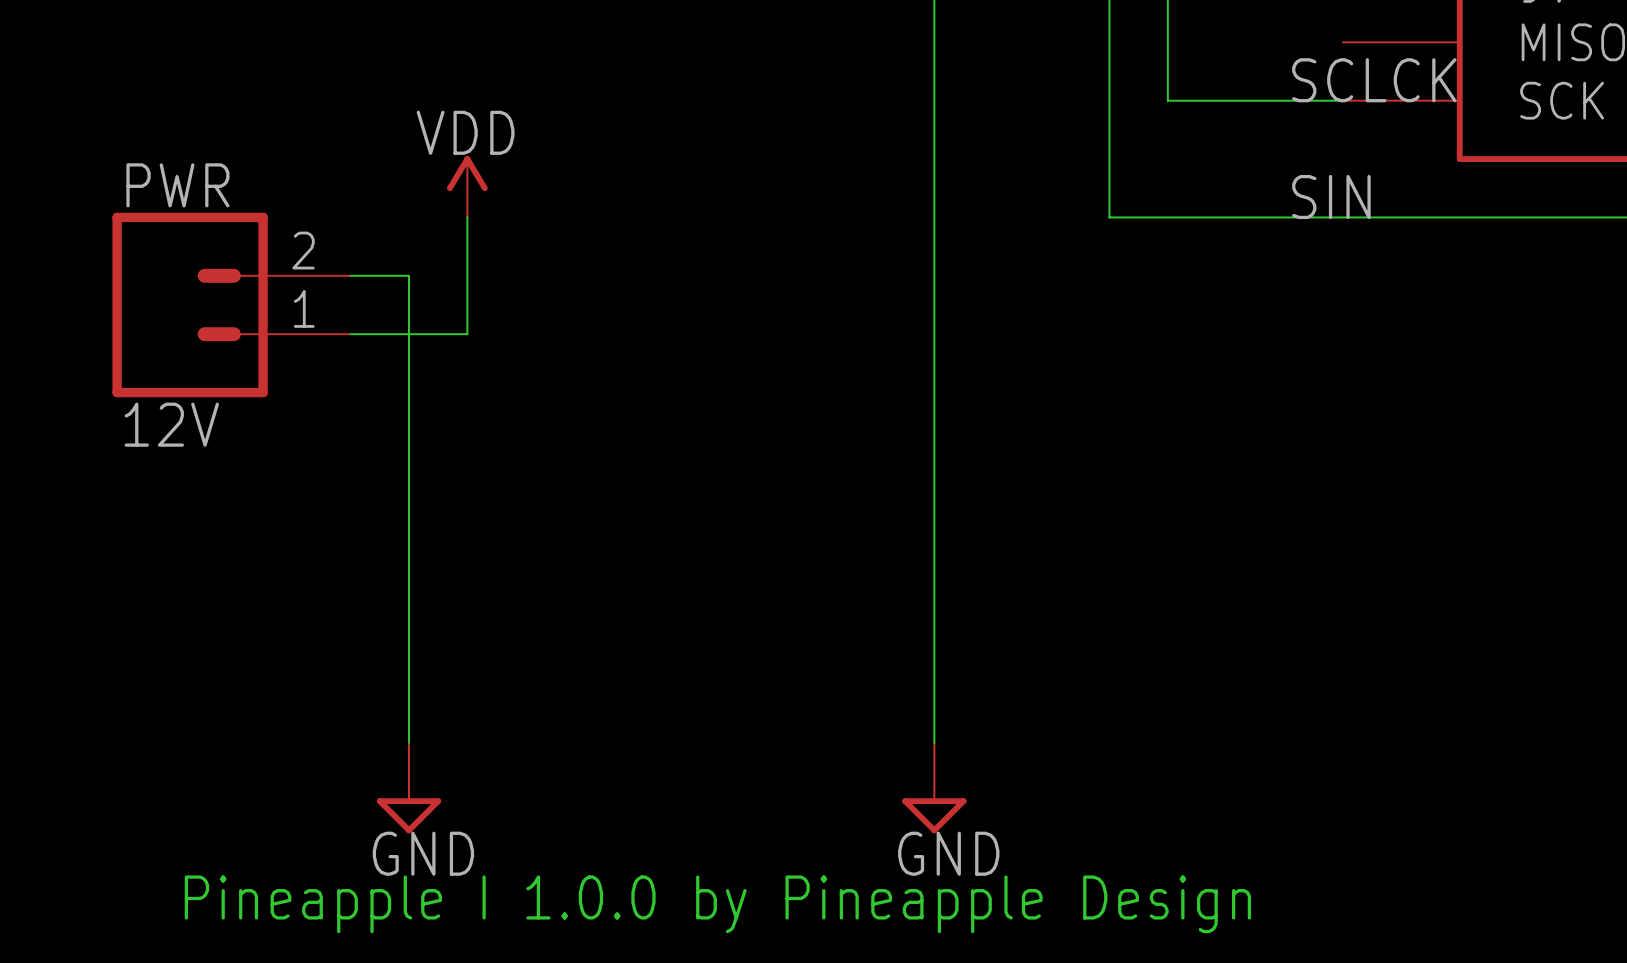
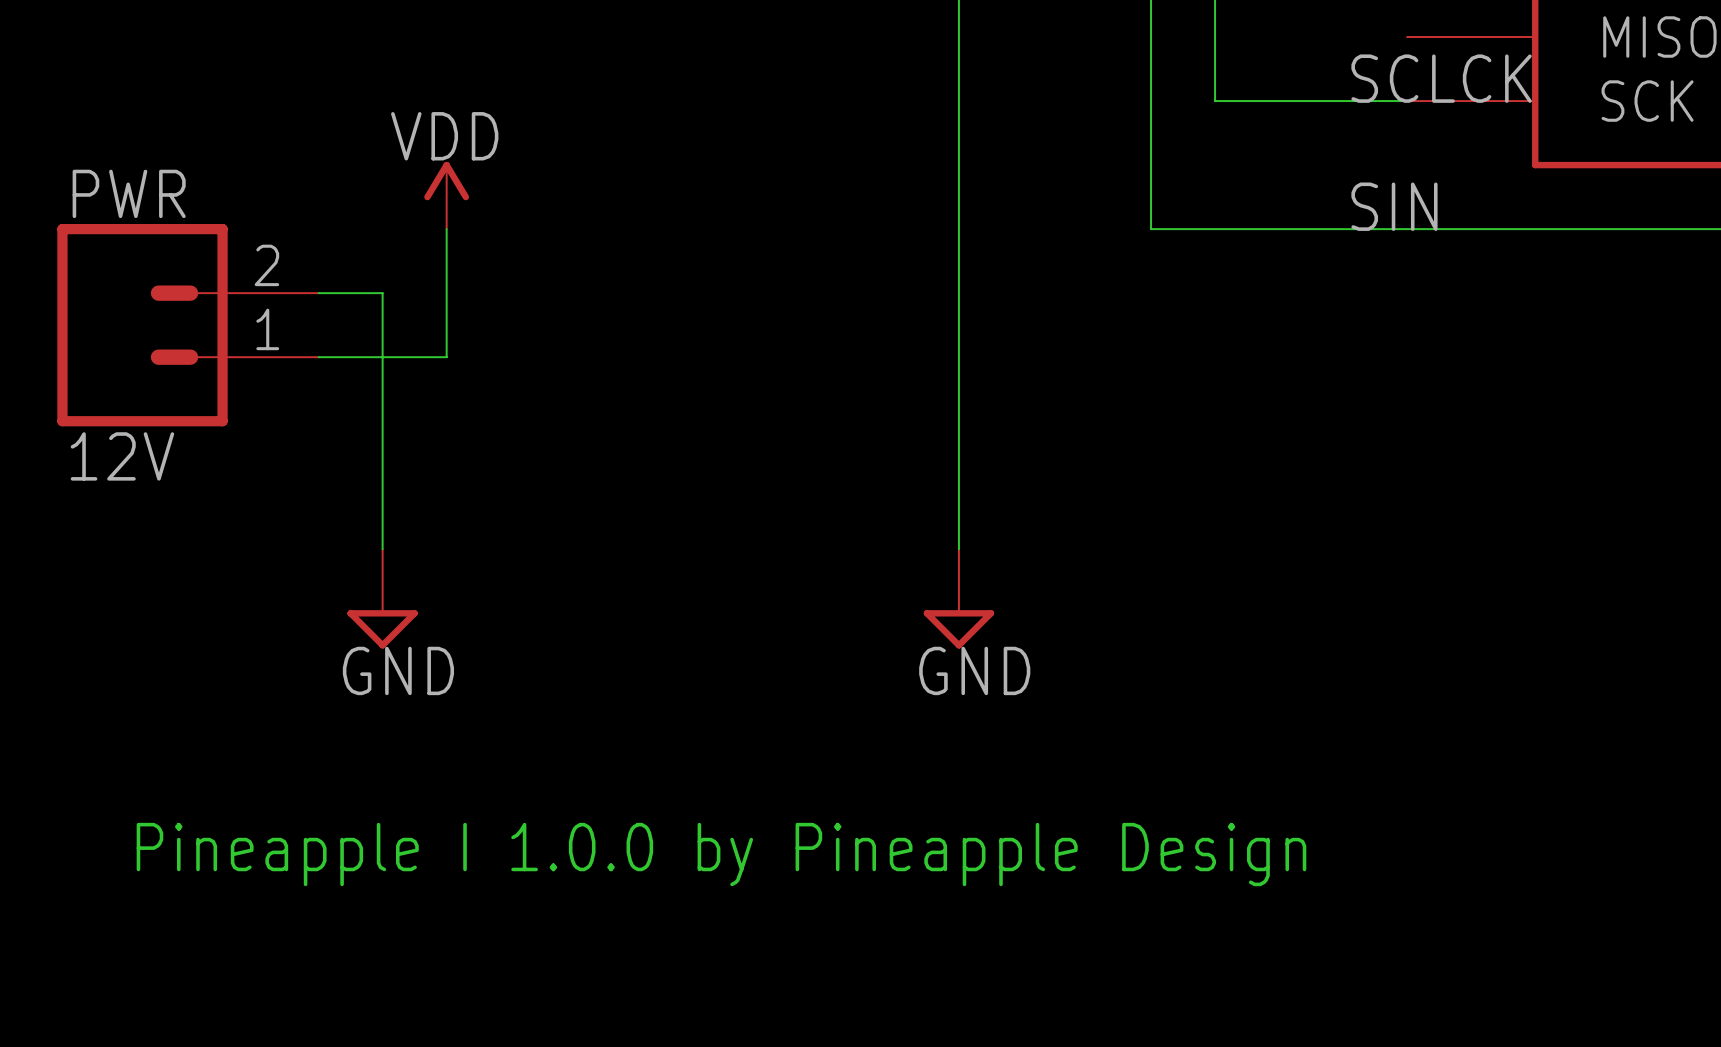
wire: (408, 509) (408, 742) -> none
wire: (934, 509) (934, 742) -> none
power symbol position: GND (408, 788) -> GND (382, 598)
power symbol position: GND (934, 788) -> GND (958, 598)
text position: Pineapple I 1.0.0 by Pineapple Design (717, 904) -> Pineapple I 1.0.0 by Pineapple Design (721, 854)

